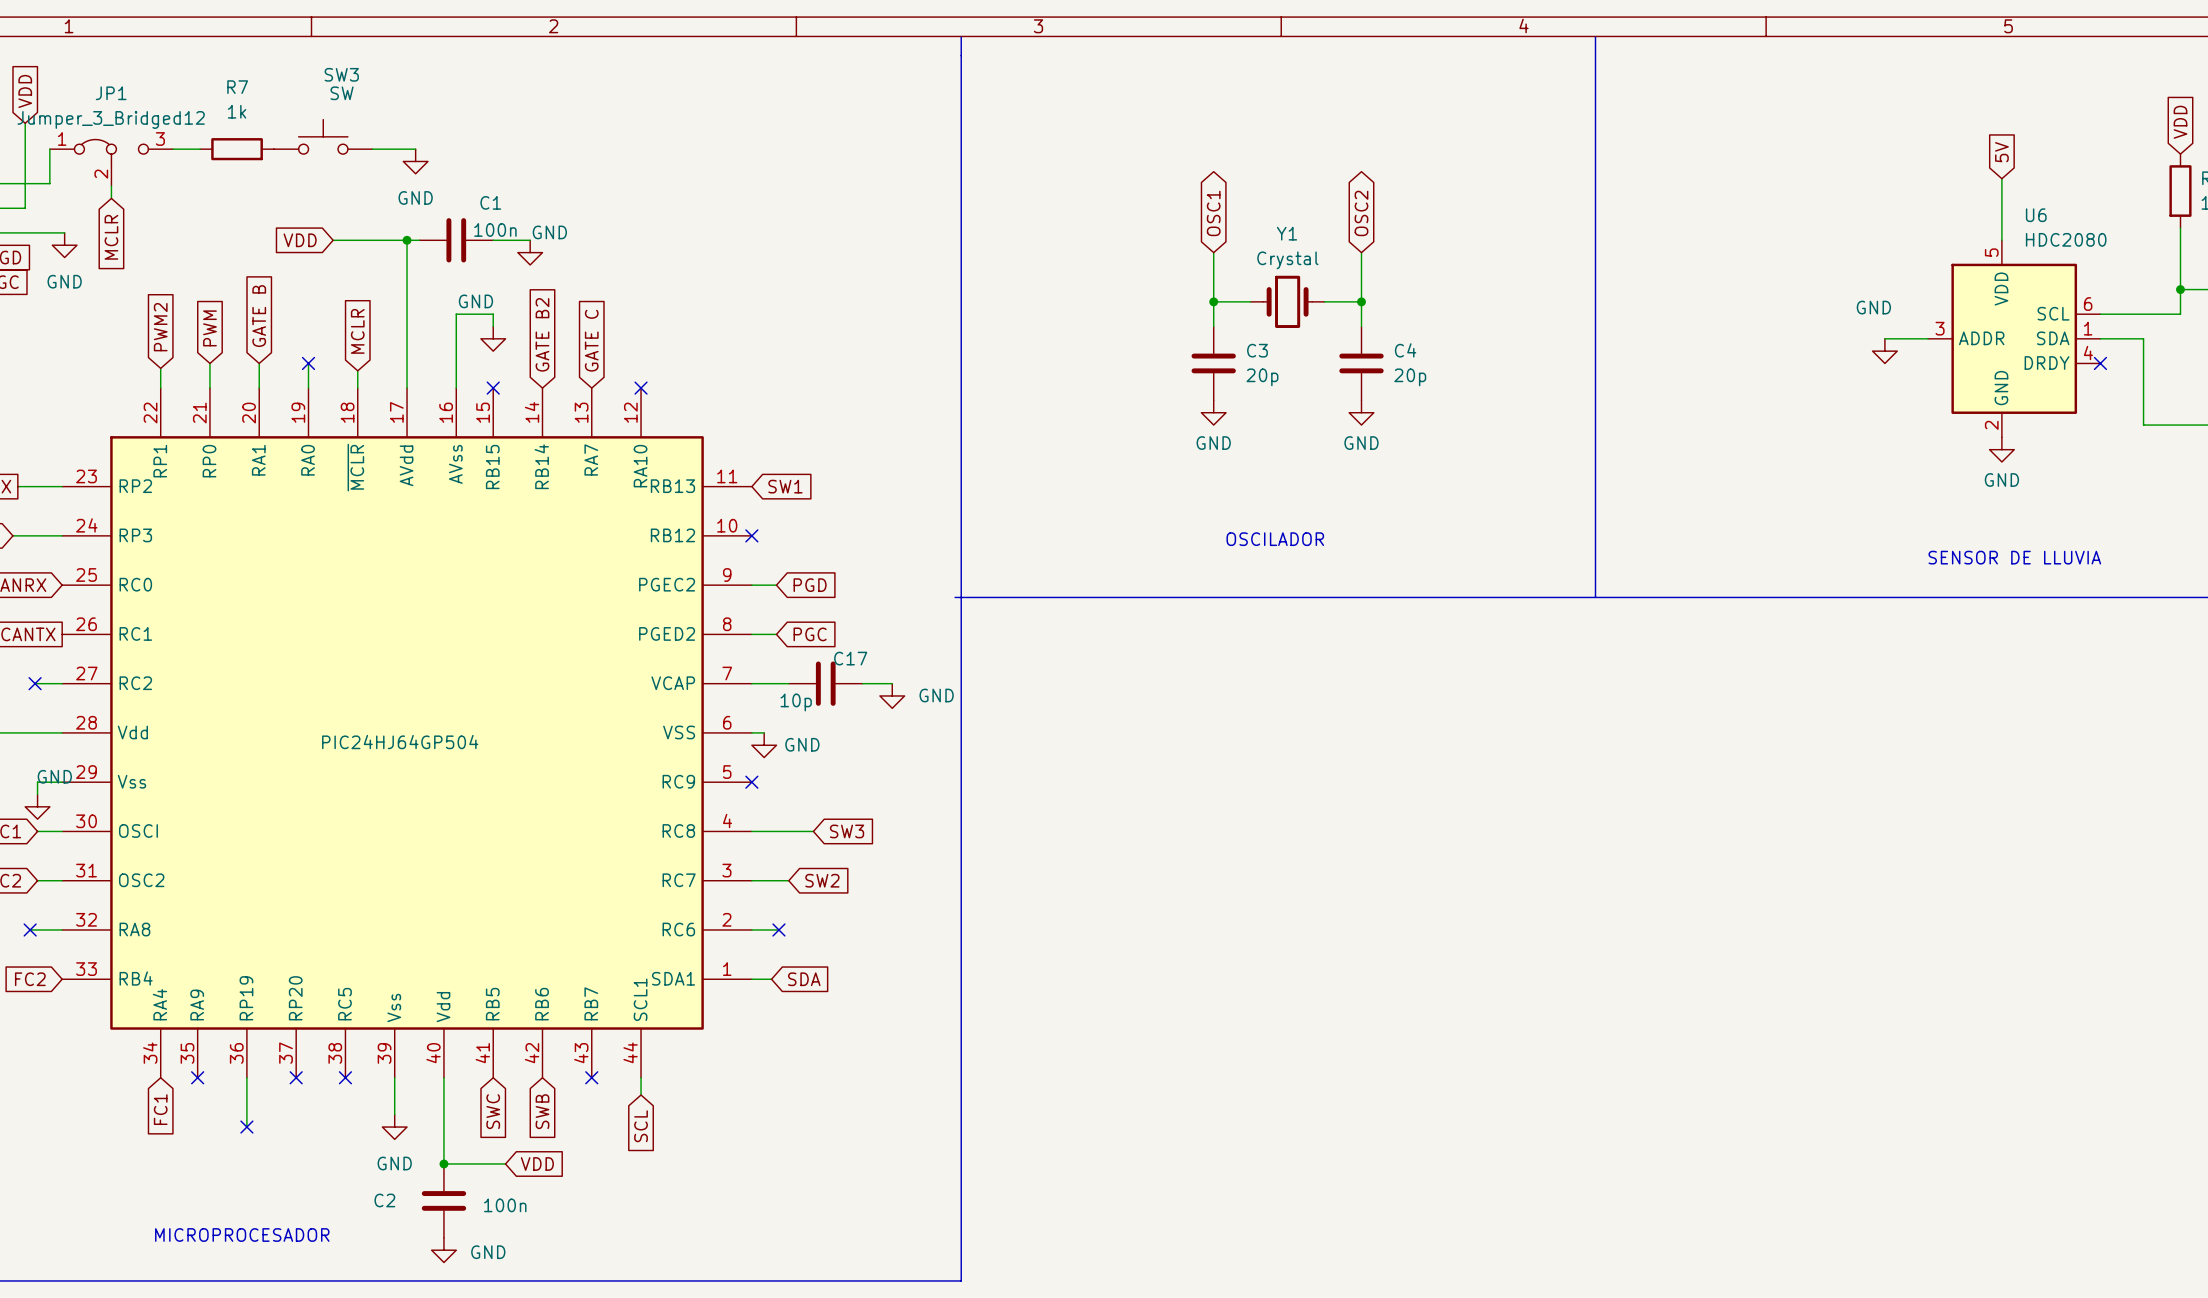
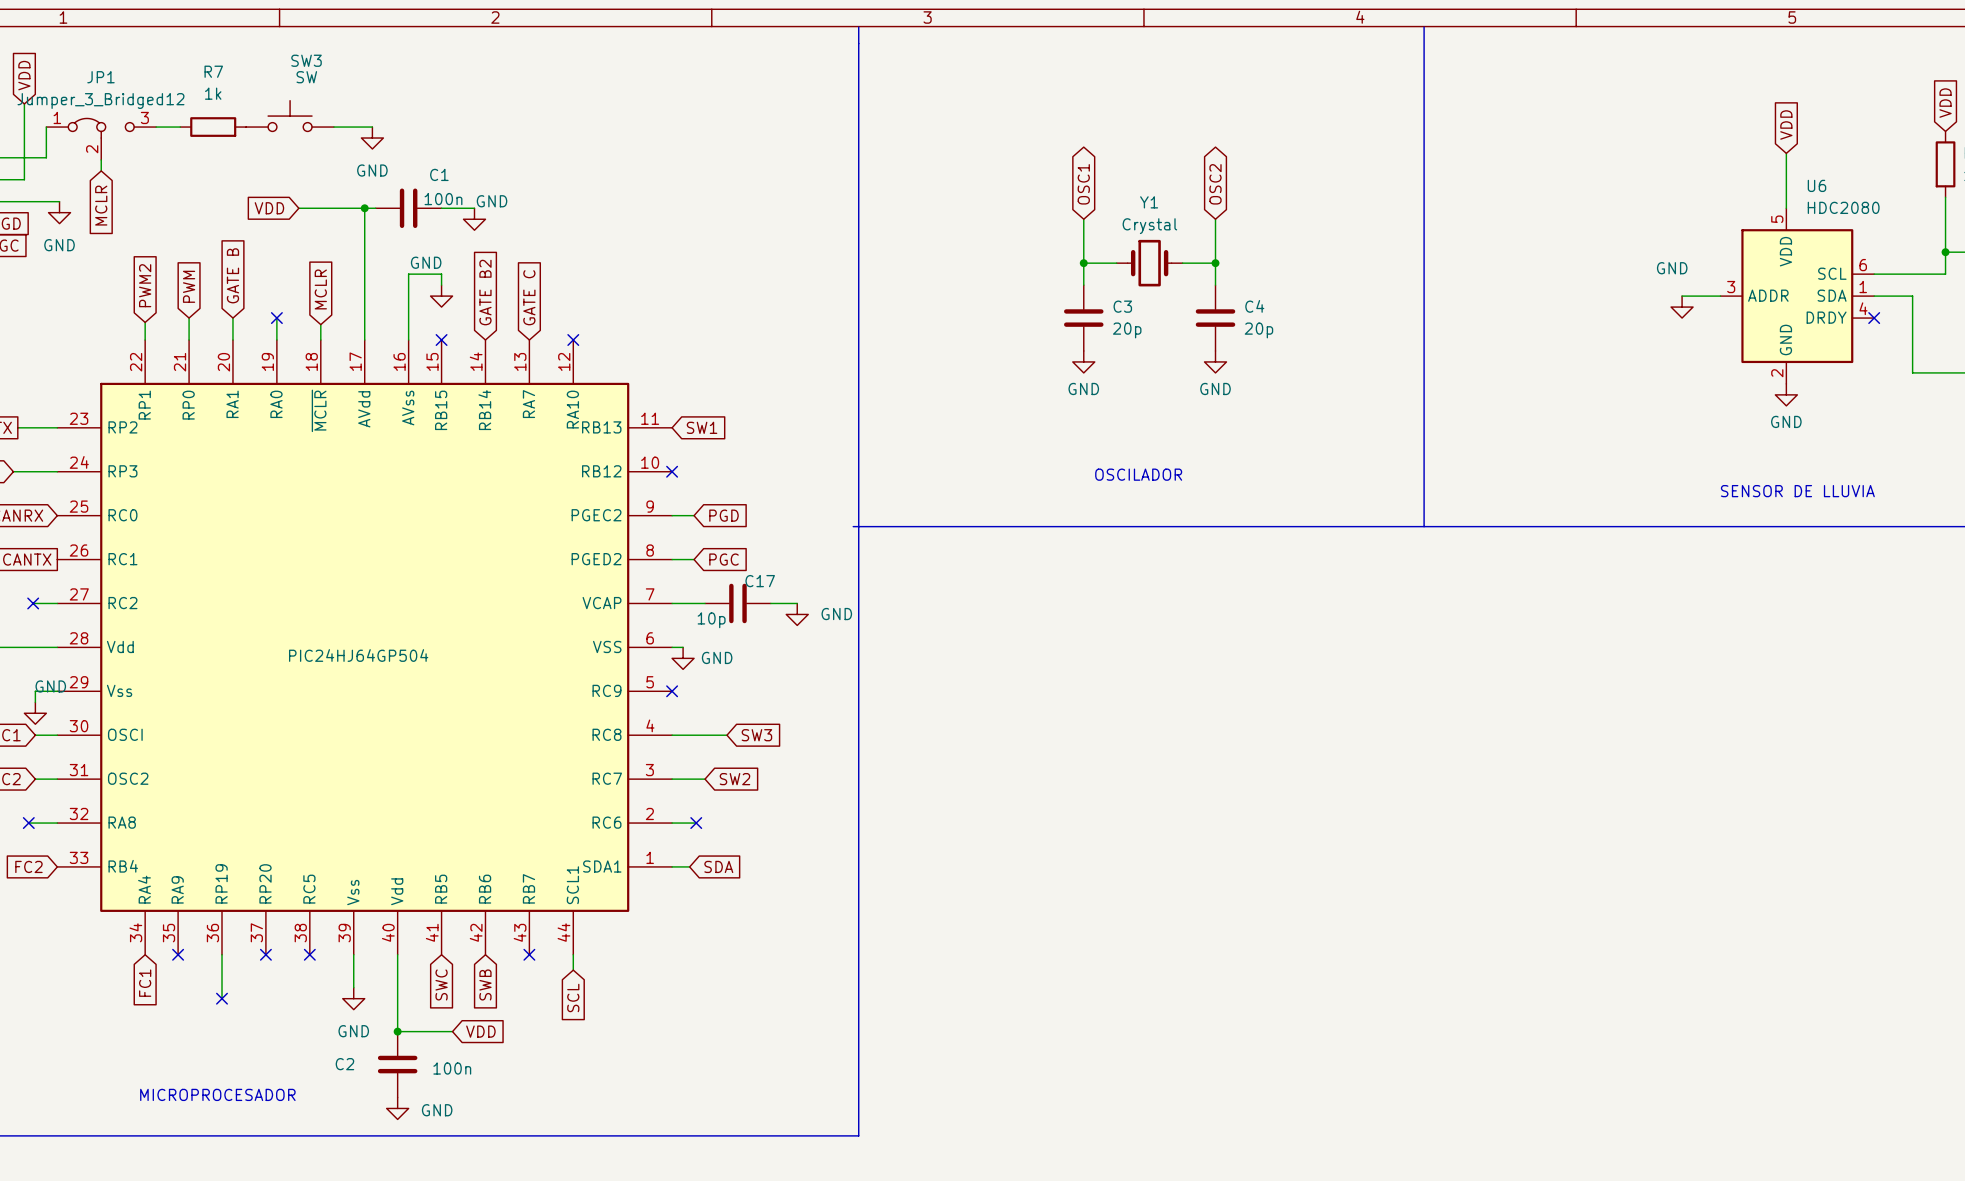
global label: 5V (2001, 152) -> VDD (1786, 125)

